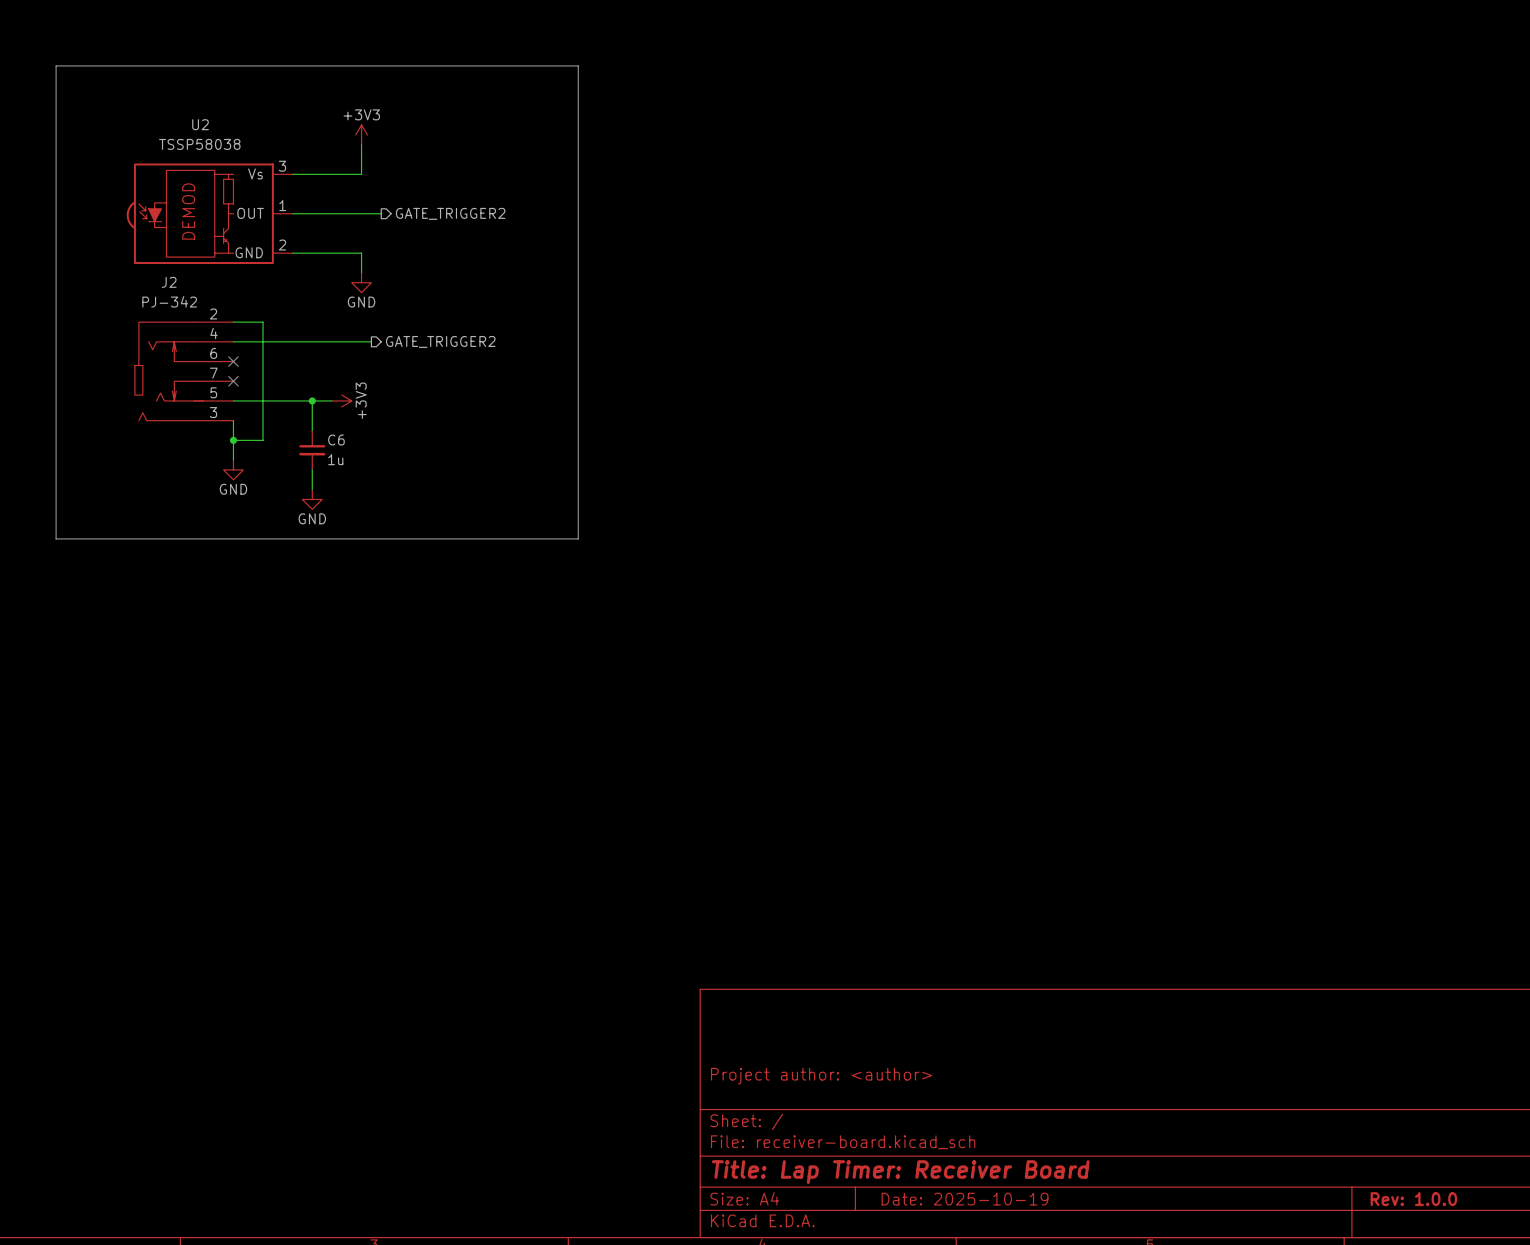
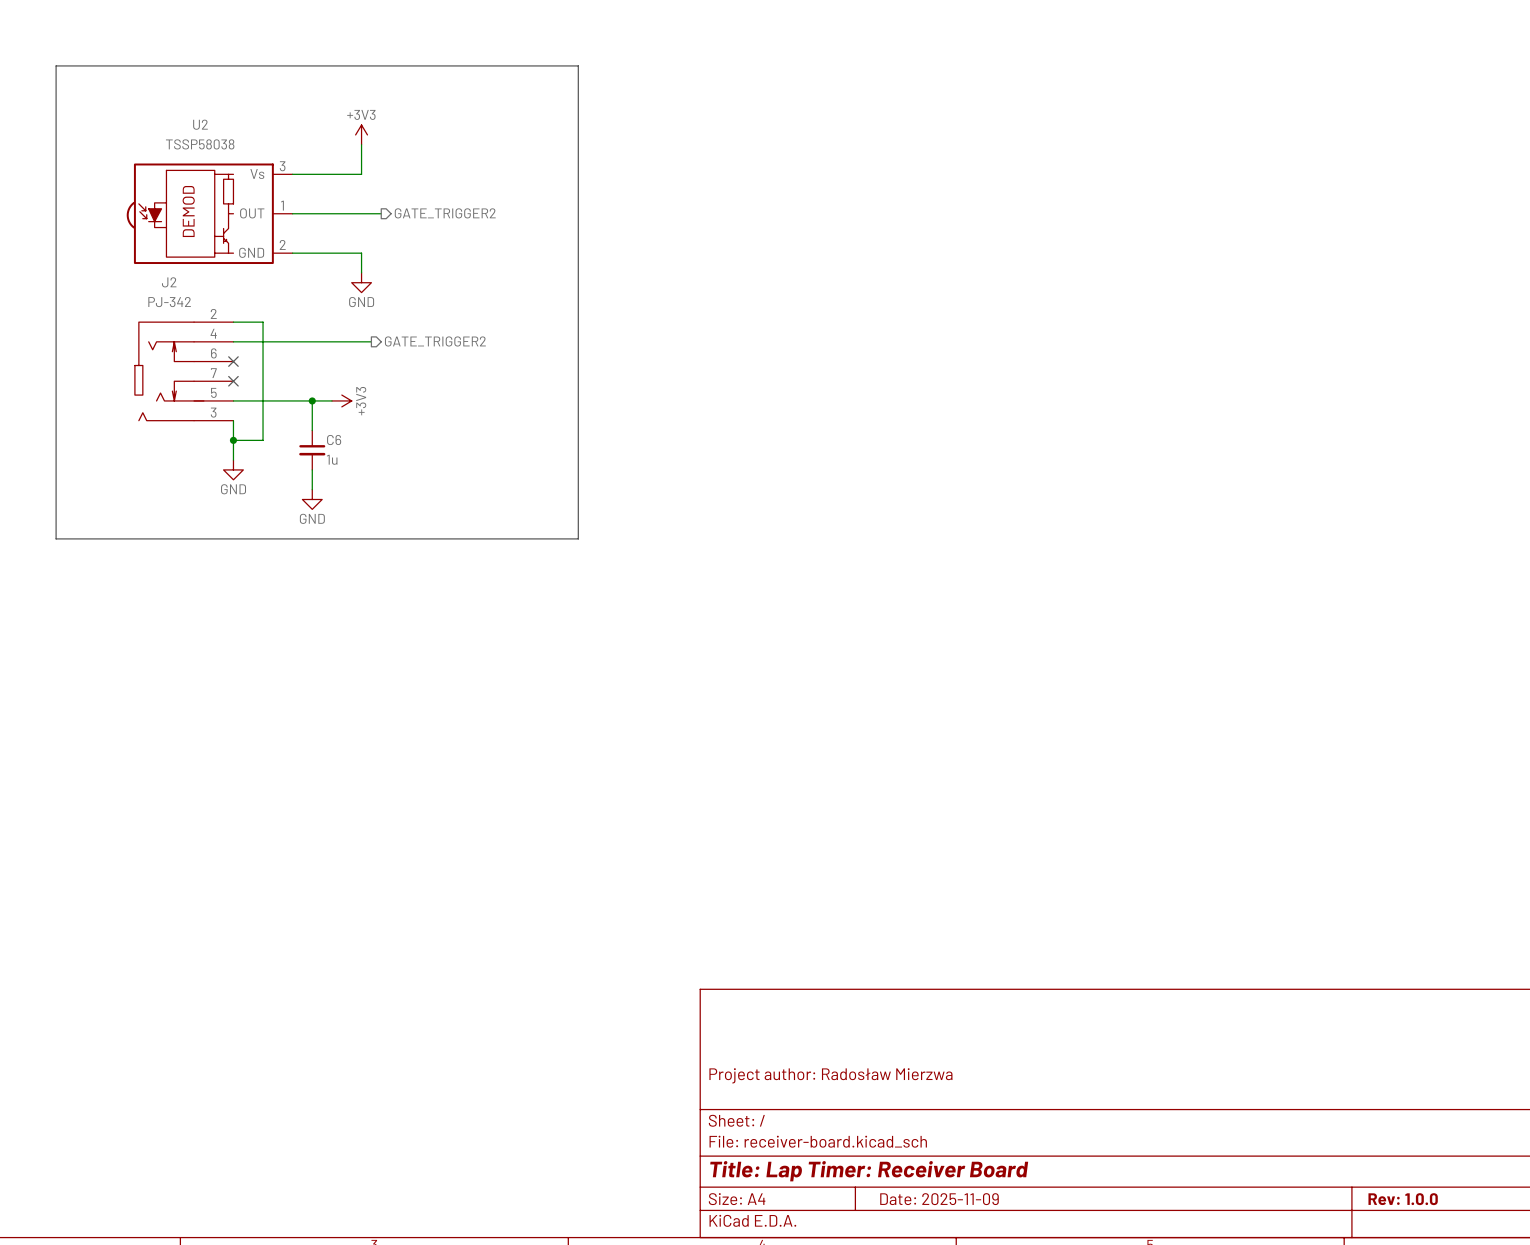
title block: Project author: <author> (821, 1076) -> Project author: Radosław Mierzwa (830, 1075)
title block: Date: 2025-10-19 (965, 1199) -> Date: 2025-11-09 (939, 1199)

